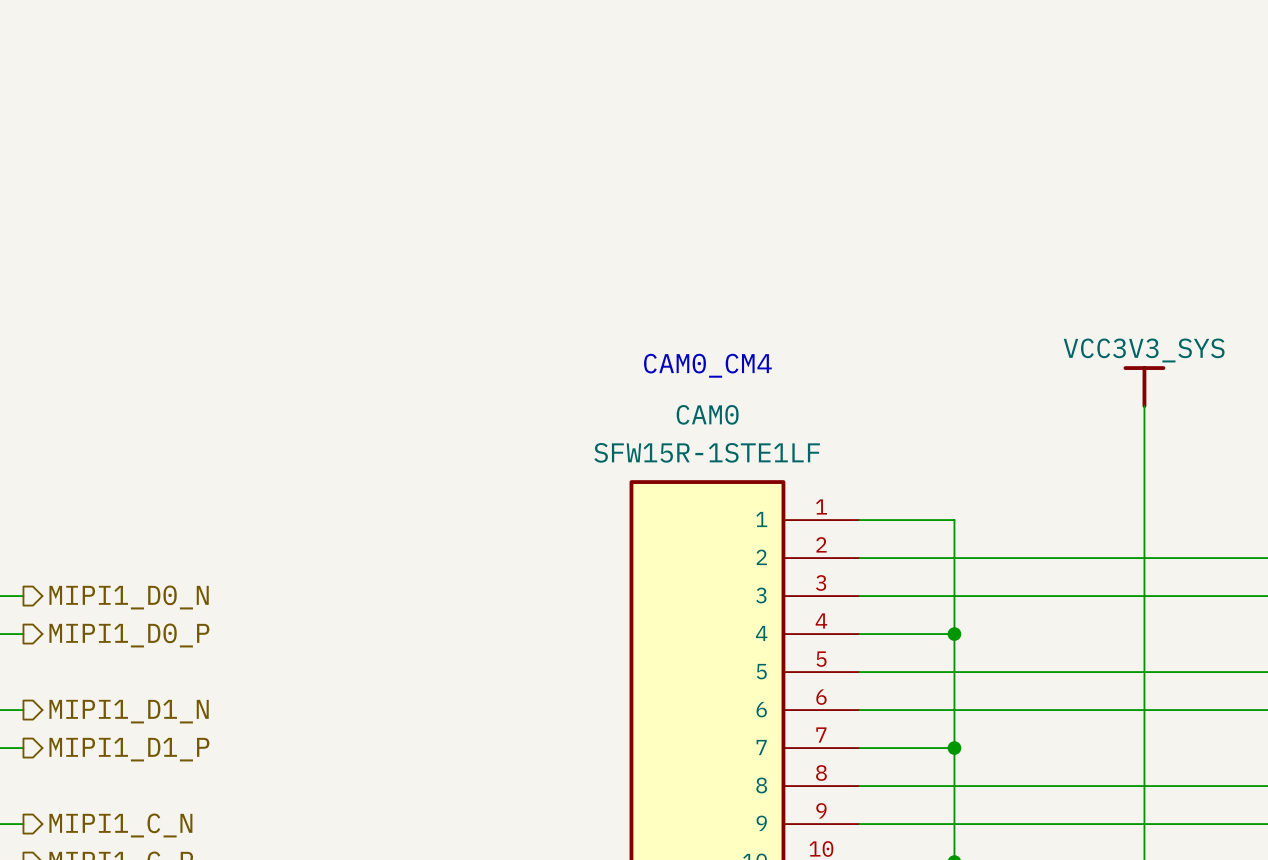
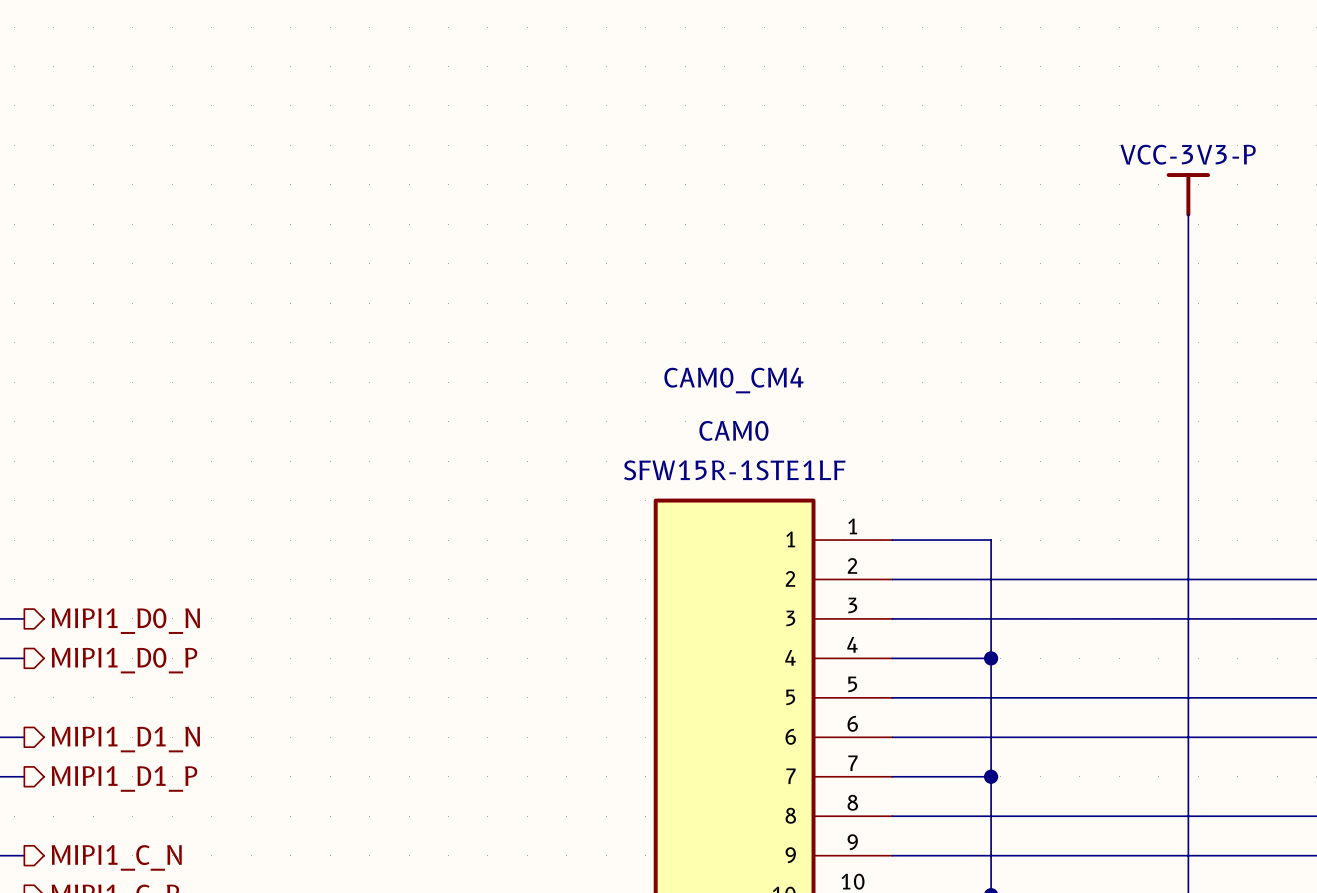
power symbol: none -> VCC-3V3-P (1188, 194)
wire: none -> (1188, 214) (1188, 421)
power symbol: VCC3V3_SYS (1144, 387) -> none

